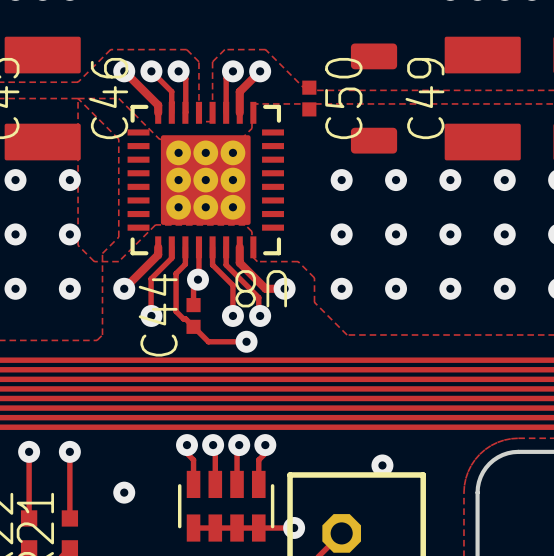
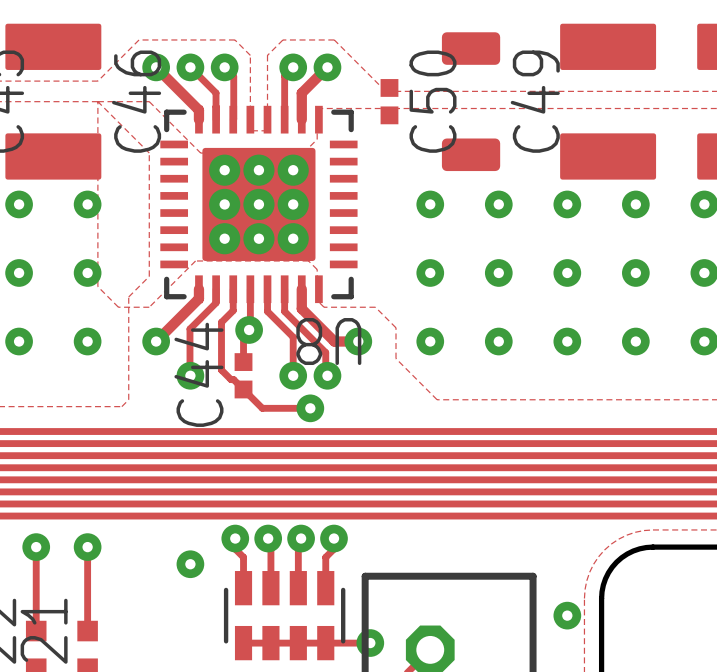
via position: (382, 465) -> (567, 615)
via position: (124, 492) -> (190, 564)

